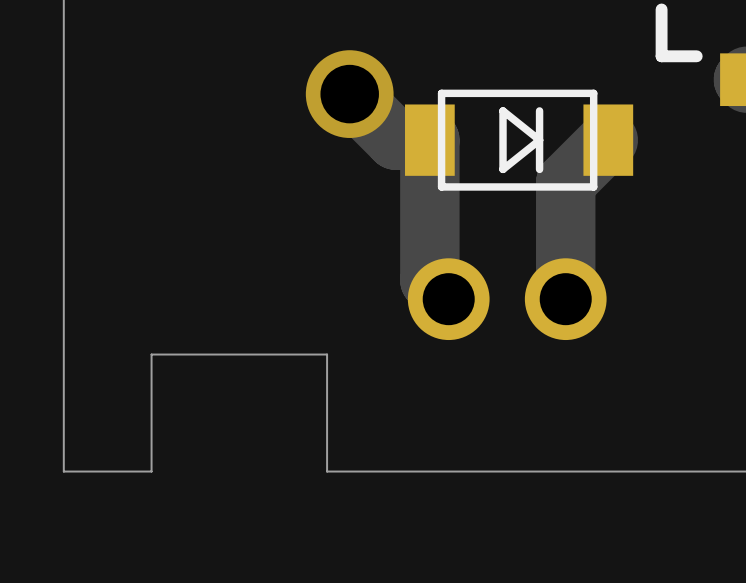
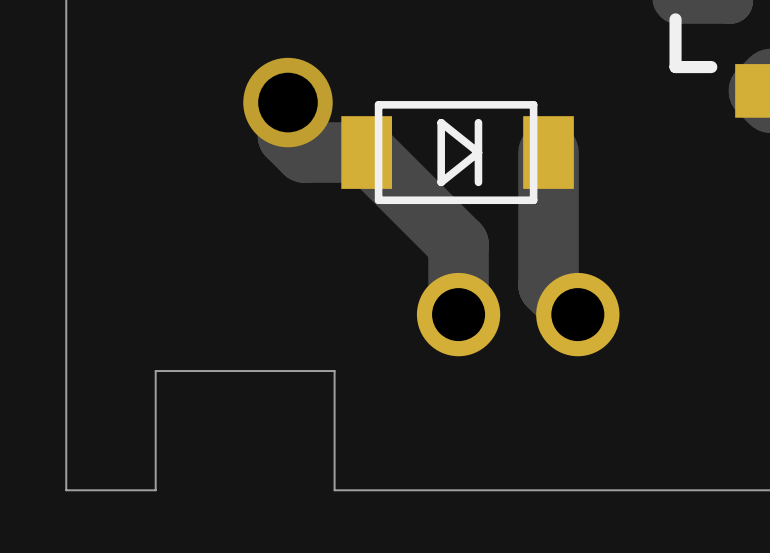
track: (349, 94) (395, 140) (429, 140) (429, 280) (448, 299) -> (287, 102) (287, 135) (304, 152) (366, 152) (458, 244) (458, 314)
via position: (349, 94) -> (287, 102)
part position: (519, 140) -> (457, 152)
track: (608, 140) (565, 182) (565, 299) -> (548, 152) (548, 285) (577, 314)

